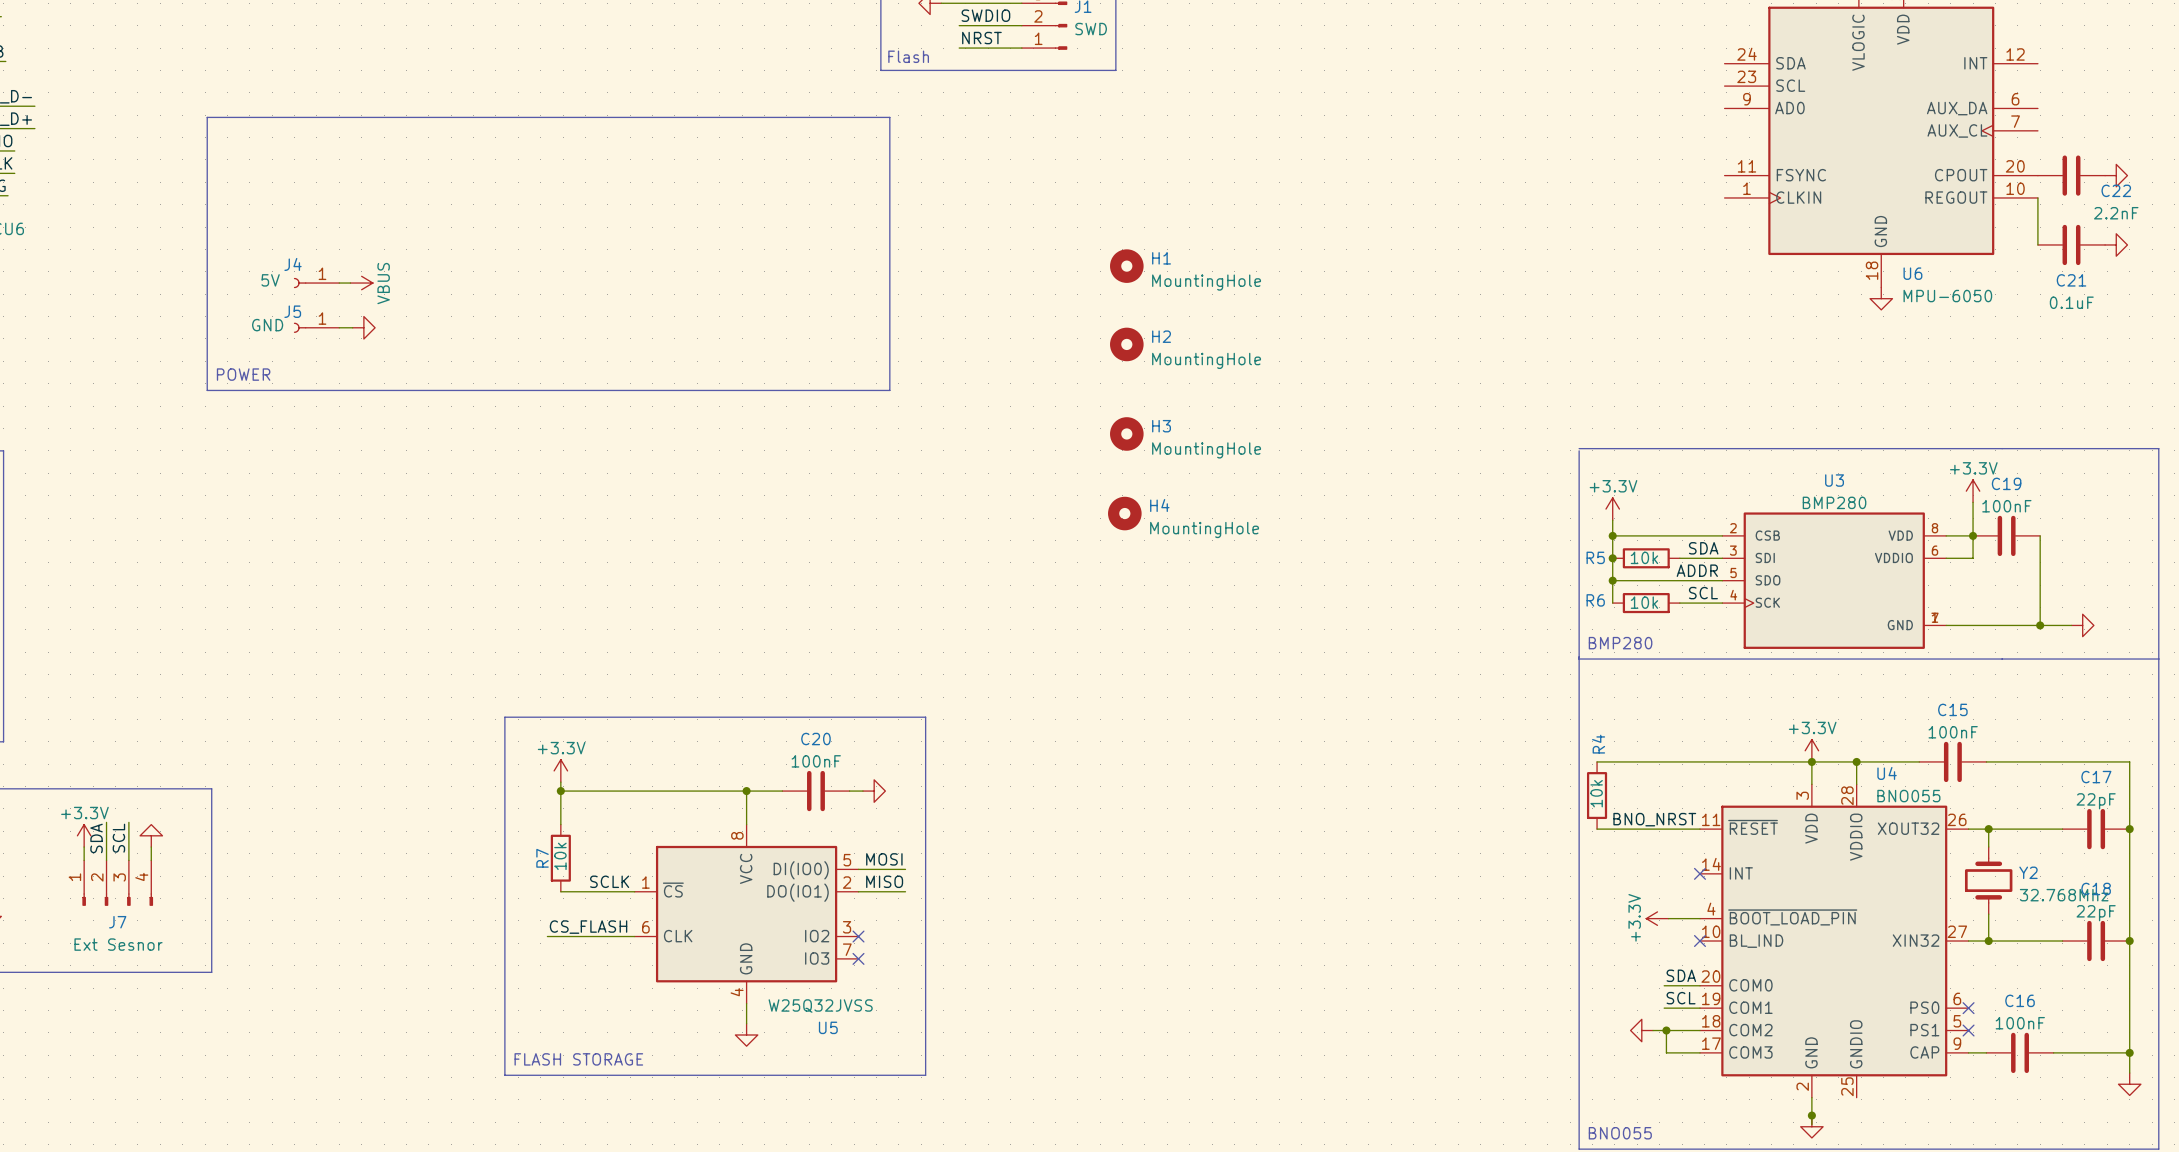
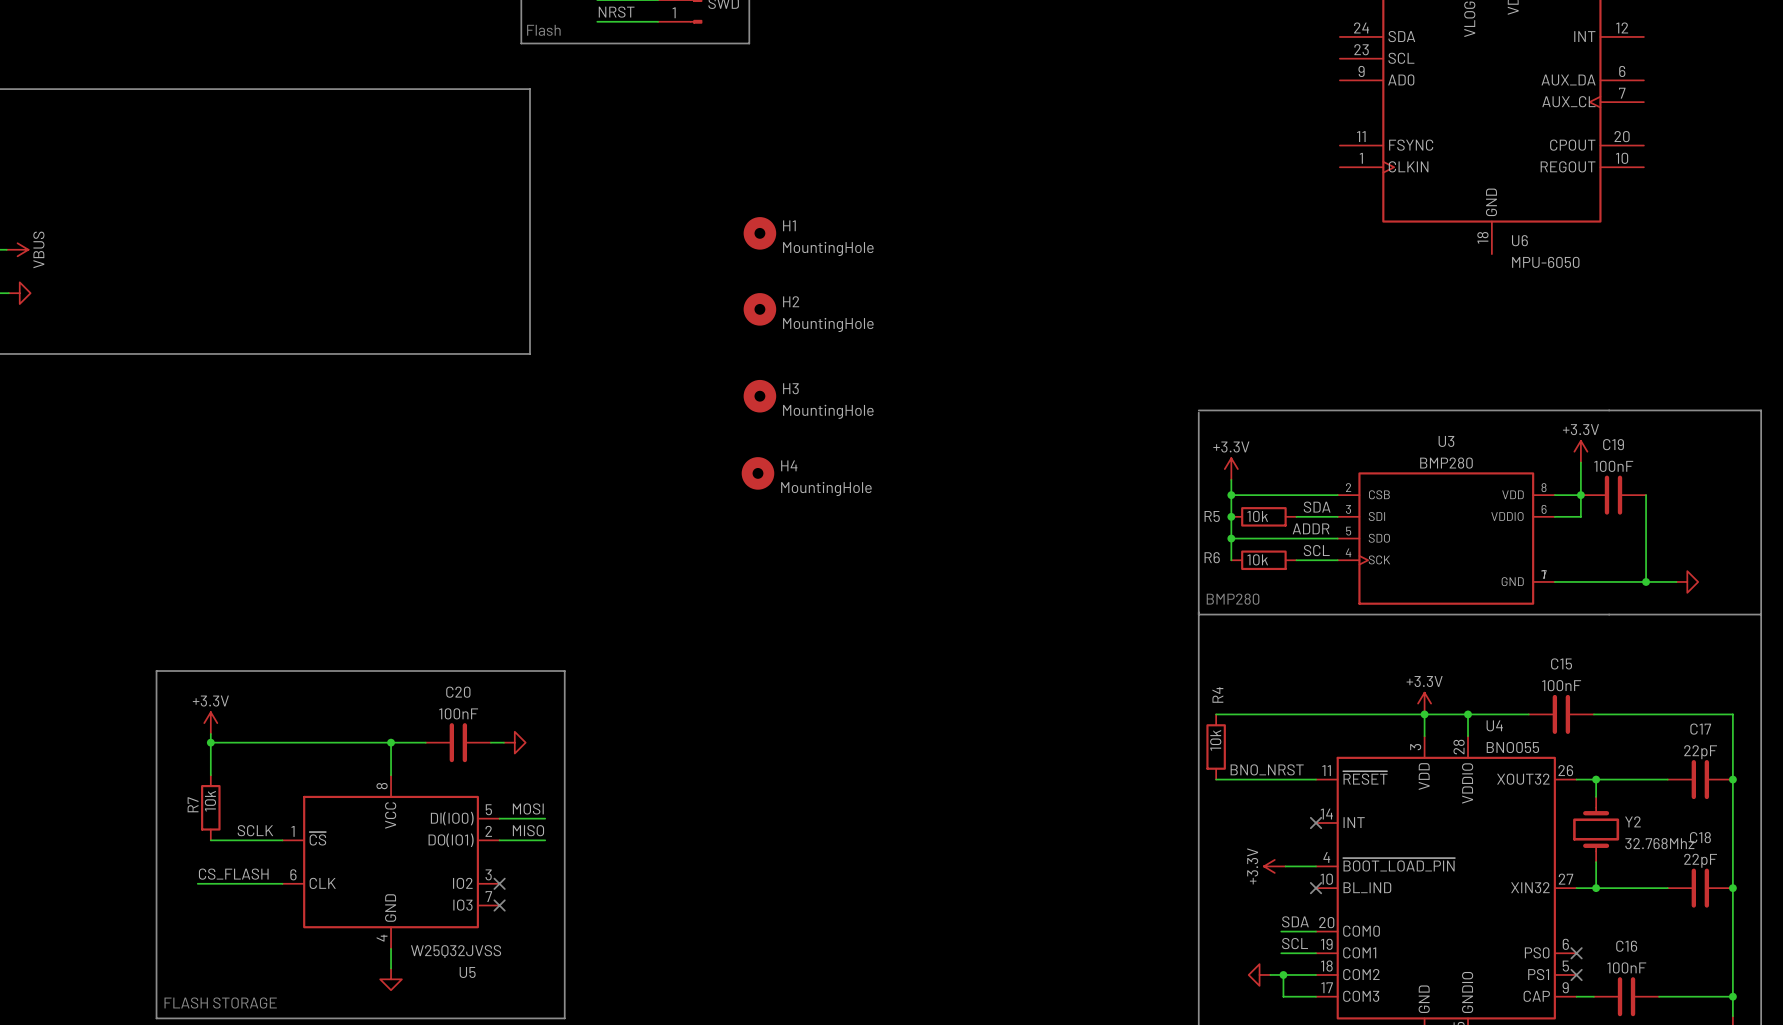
C22: 2.2nF (2071, 175) -> none
power symbol: (2116, 175) -> none
wire: (2037, 197) (2037, 244) -> none
C21: 0.1uF (2071, 244) -> none
power symbol: (2116, 244) -> none
power symbol: (1881, 298) -> none

